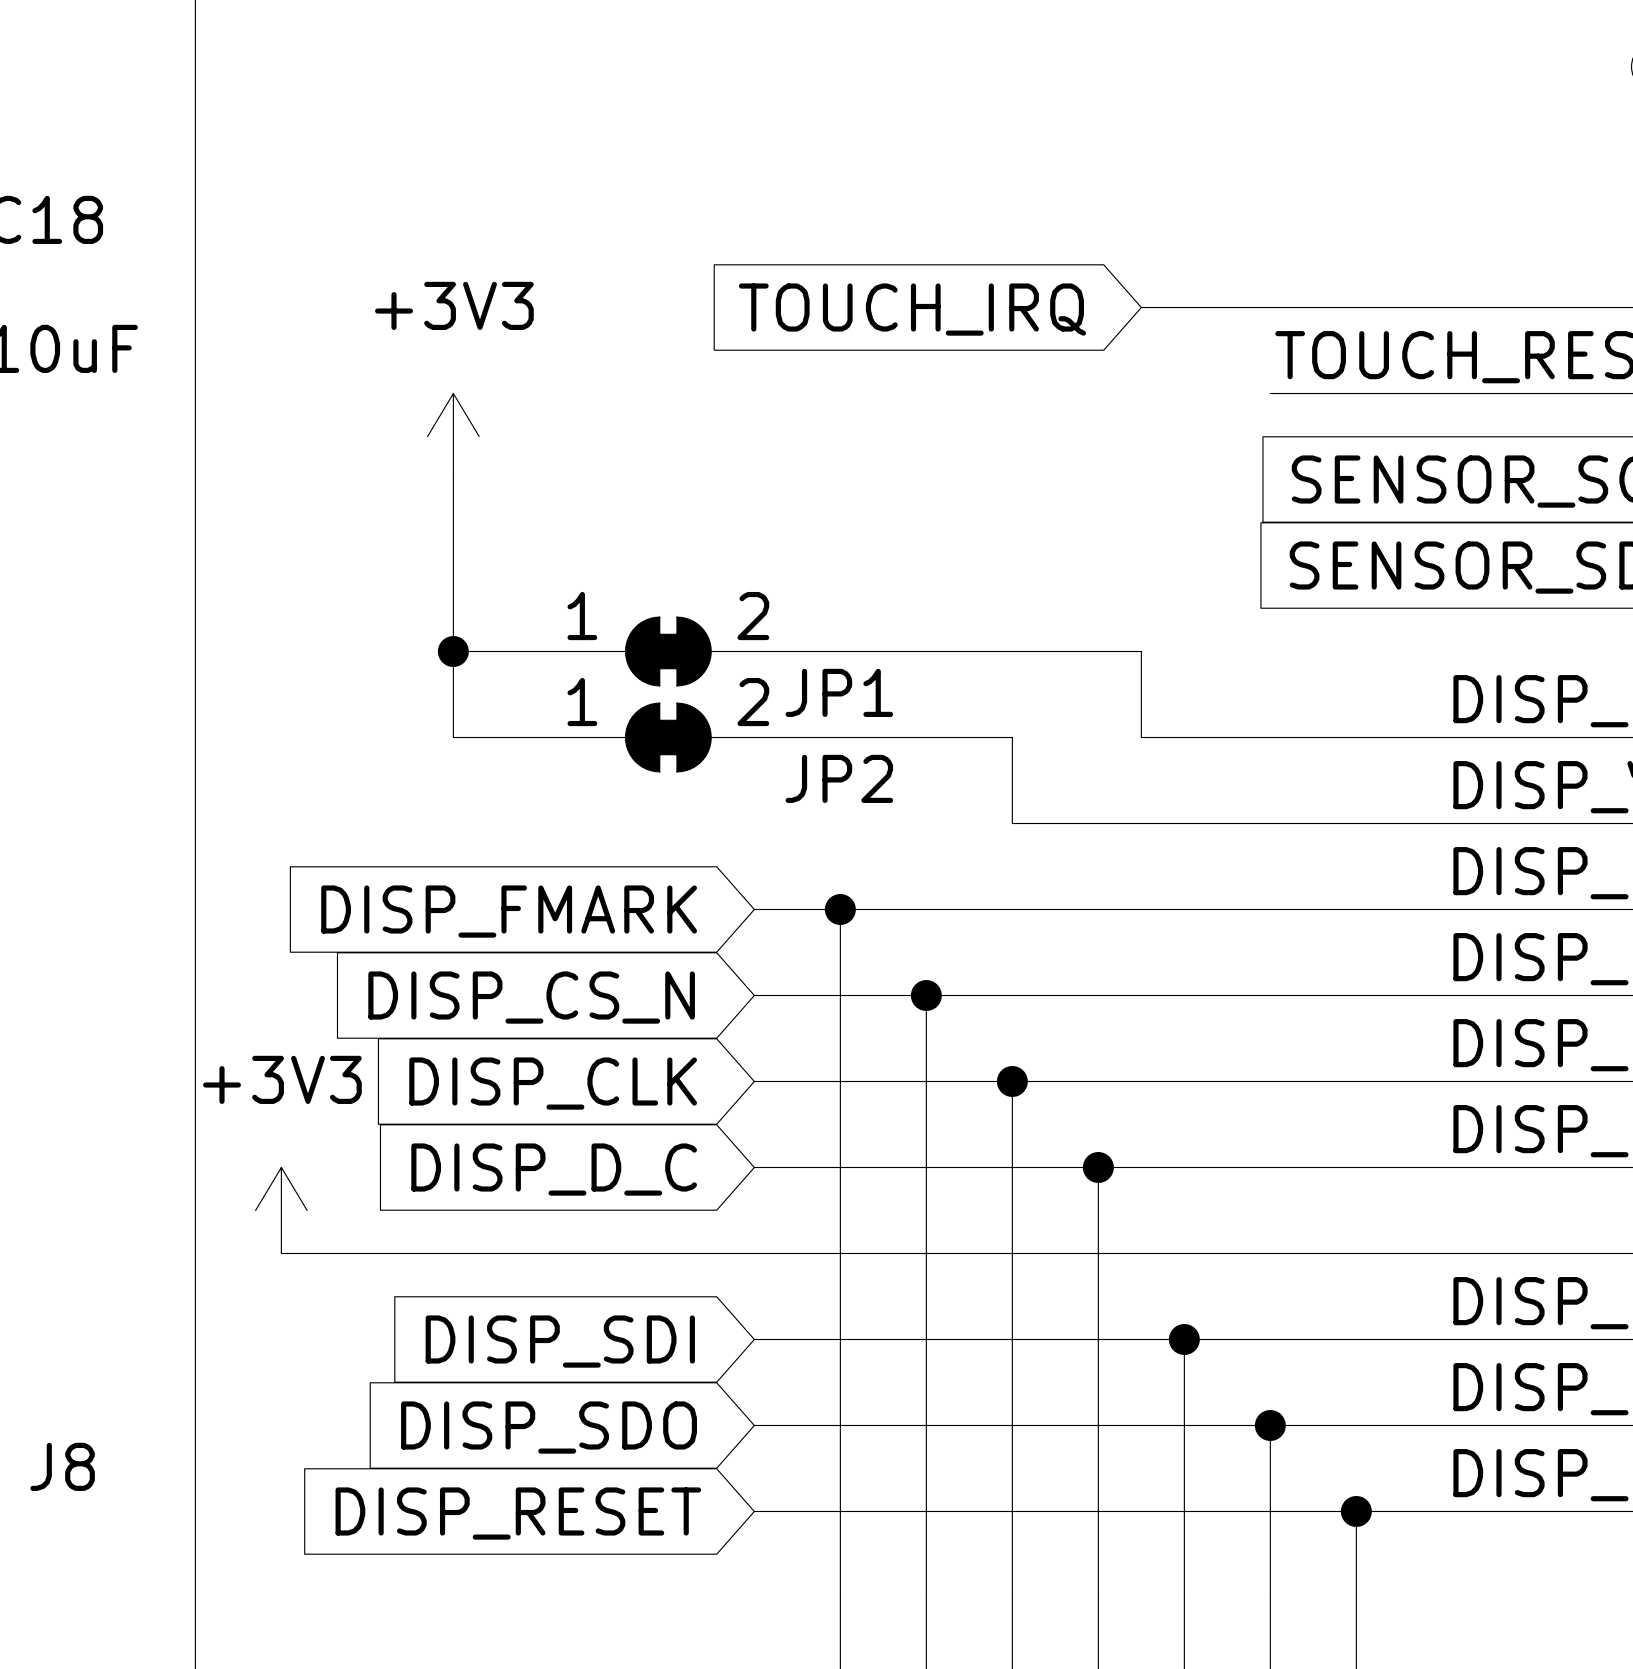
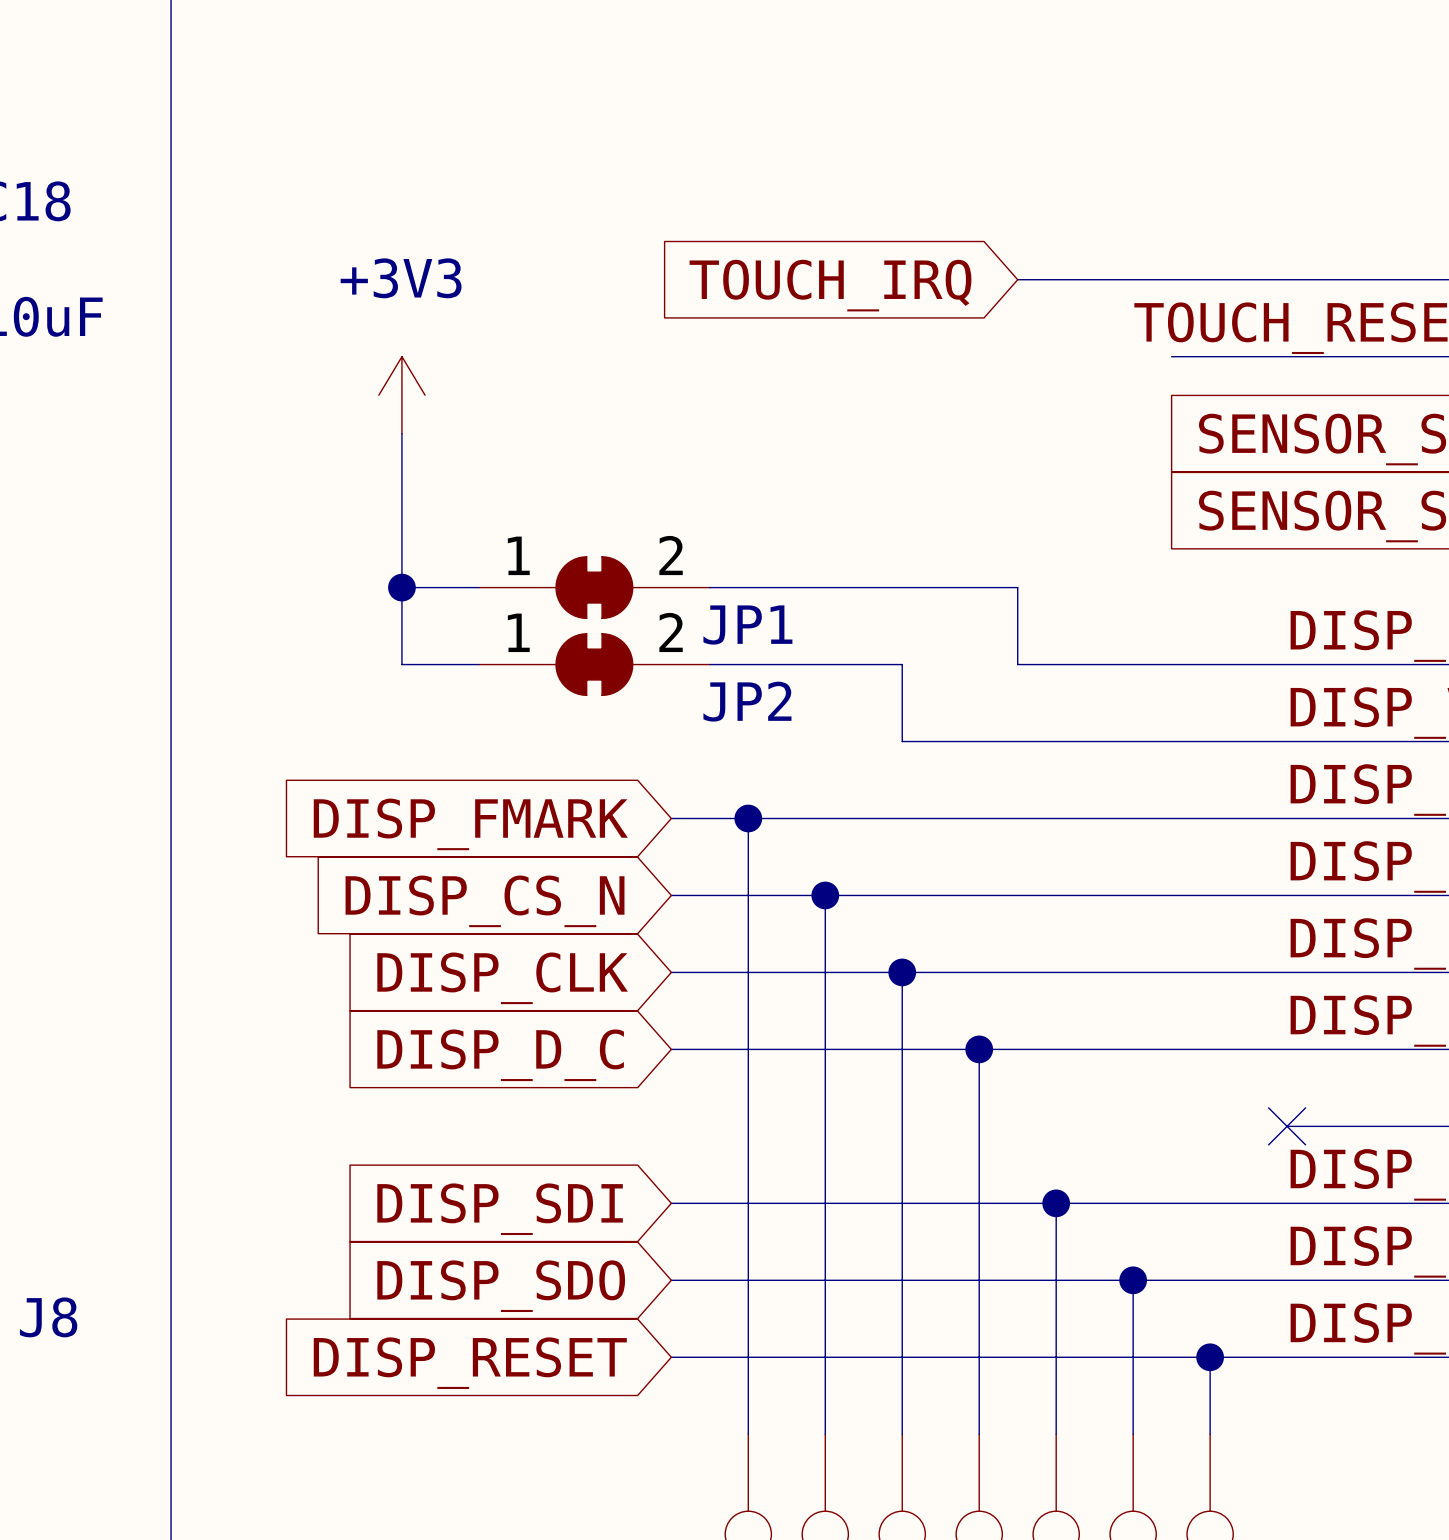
wire: (1270, 393) (1313, 393) -> none
power symbol: +3V3 (281, 1210) -> none
wire: (281, 1253) (1442, 1253) -> none
no-connect mark: none -> (1287, 1126)

